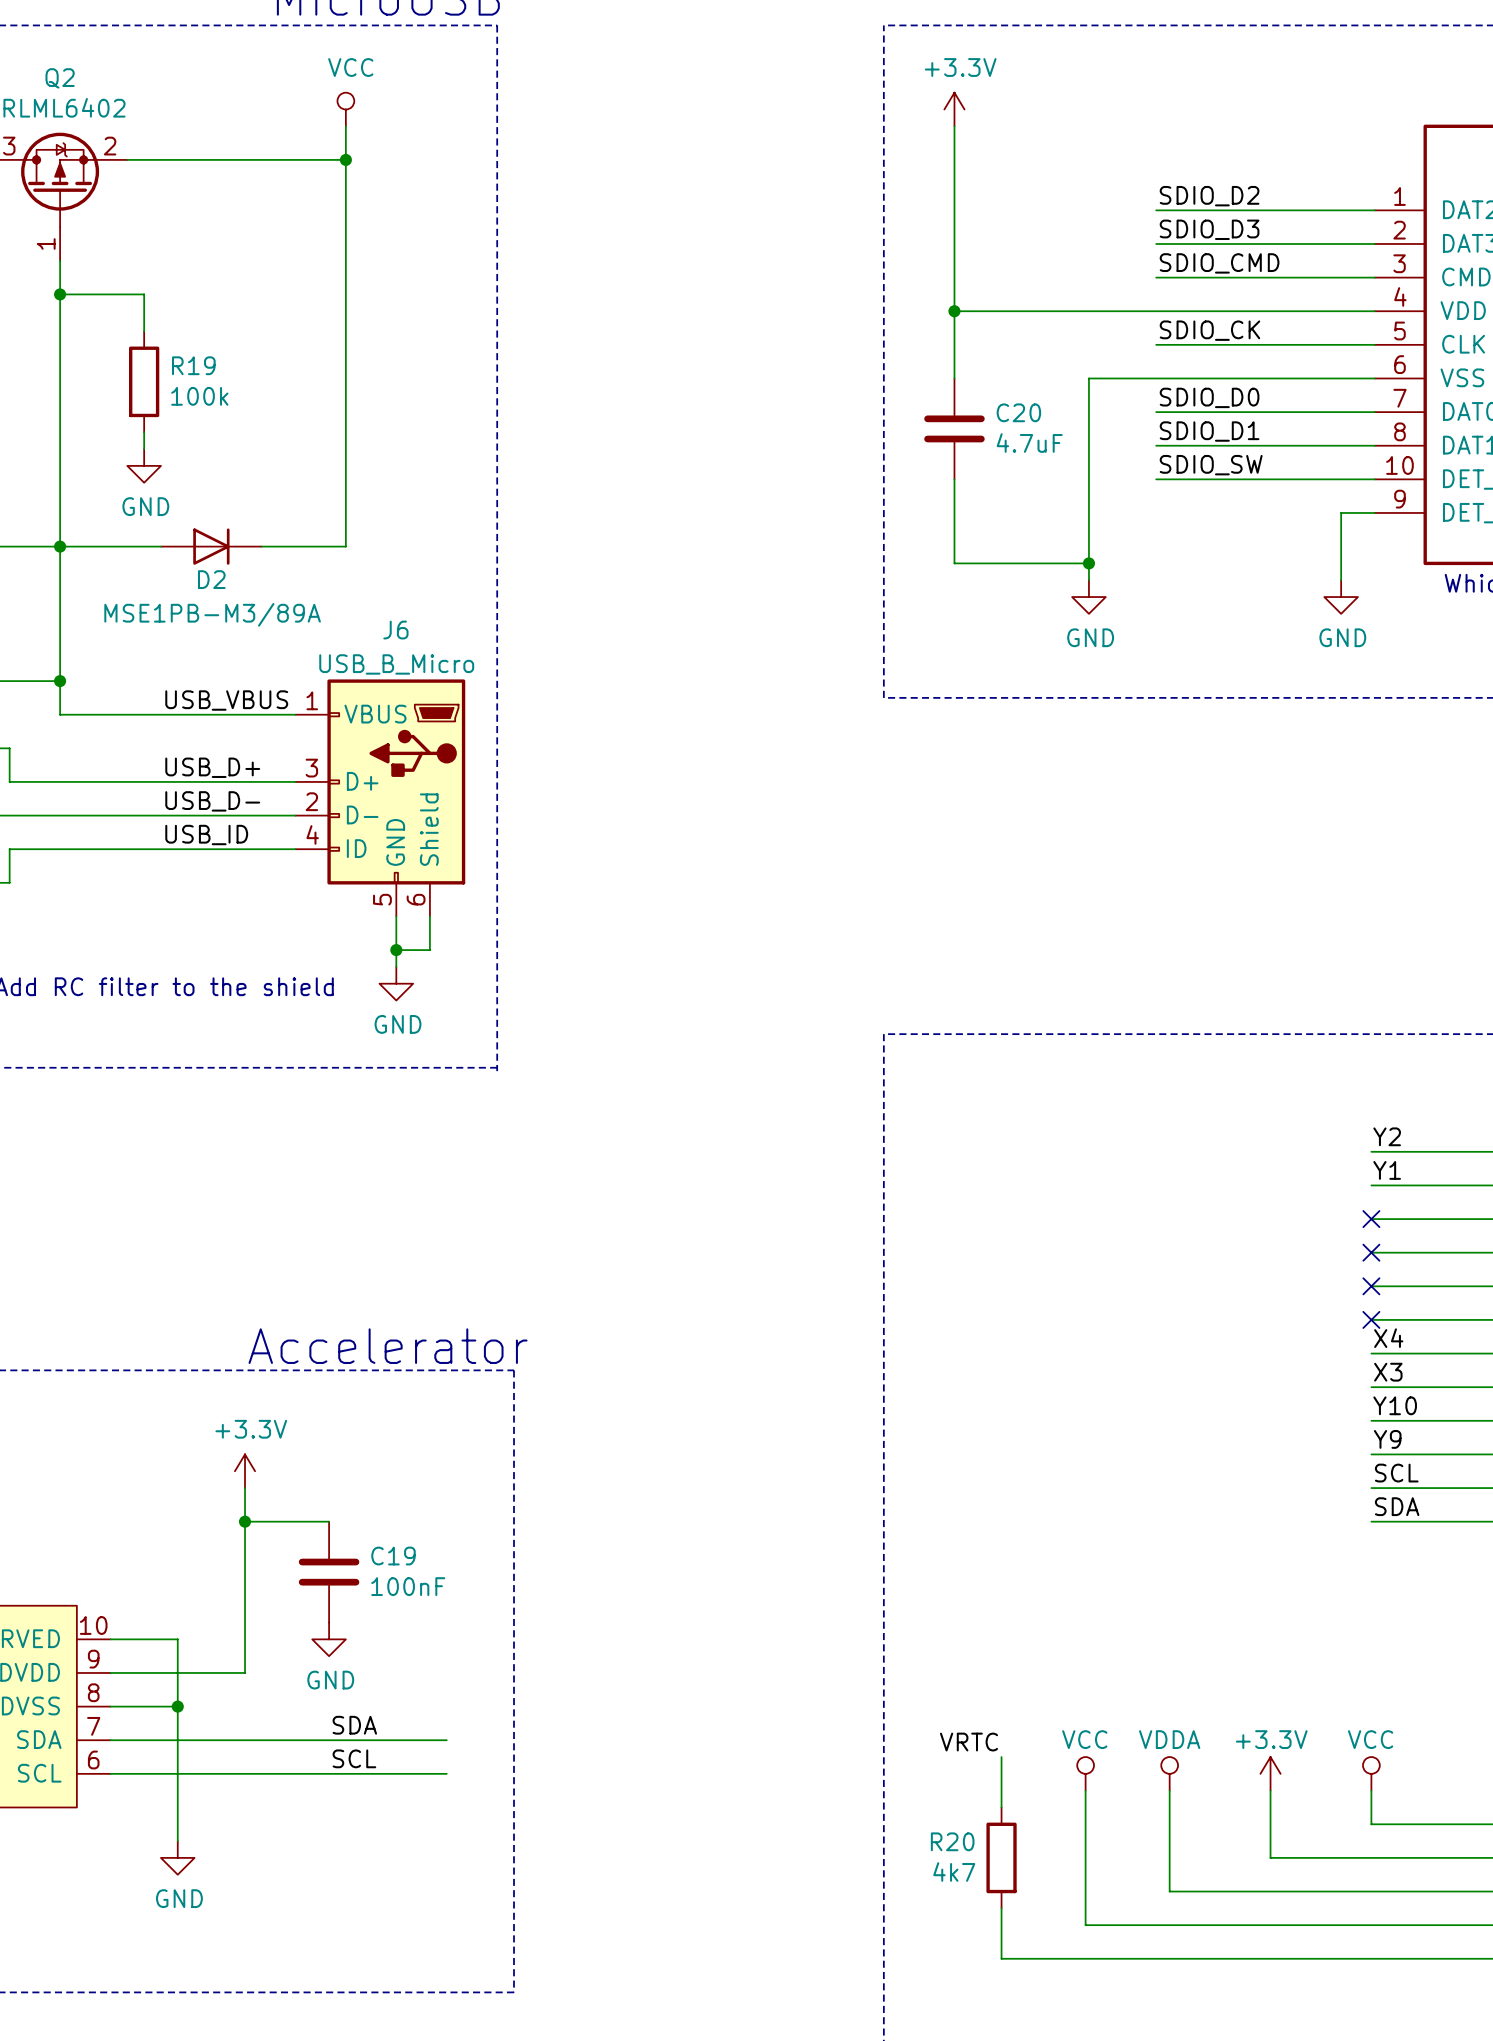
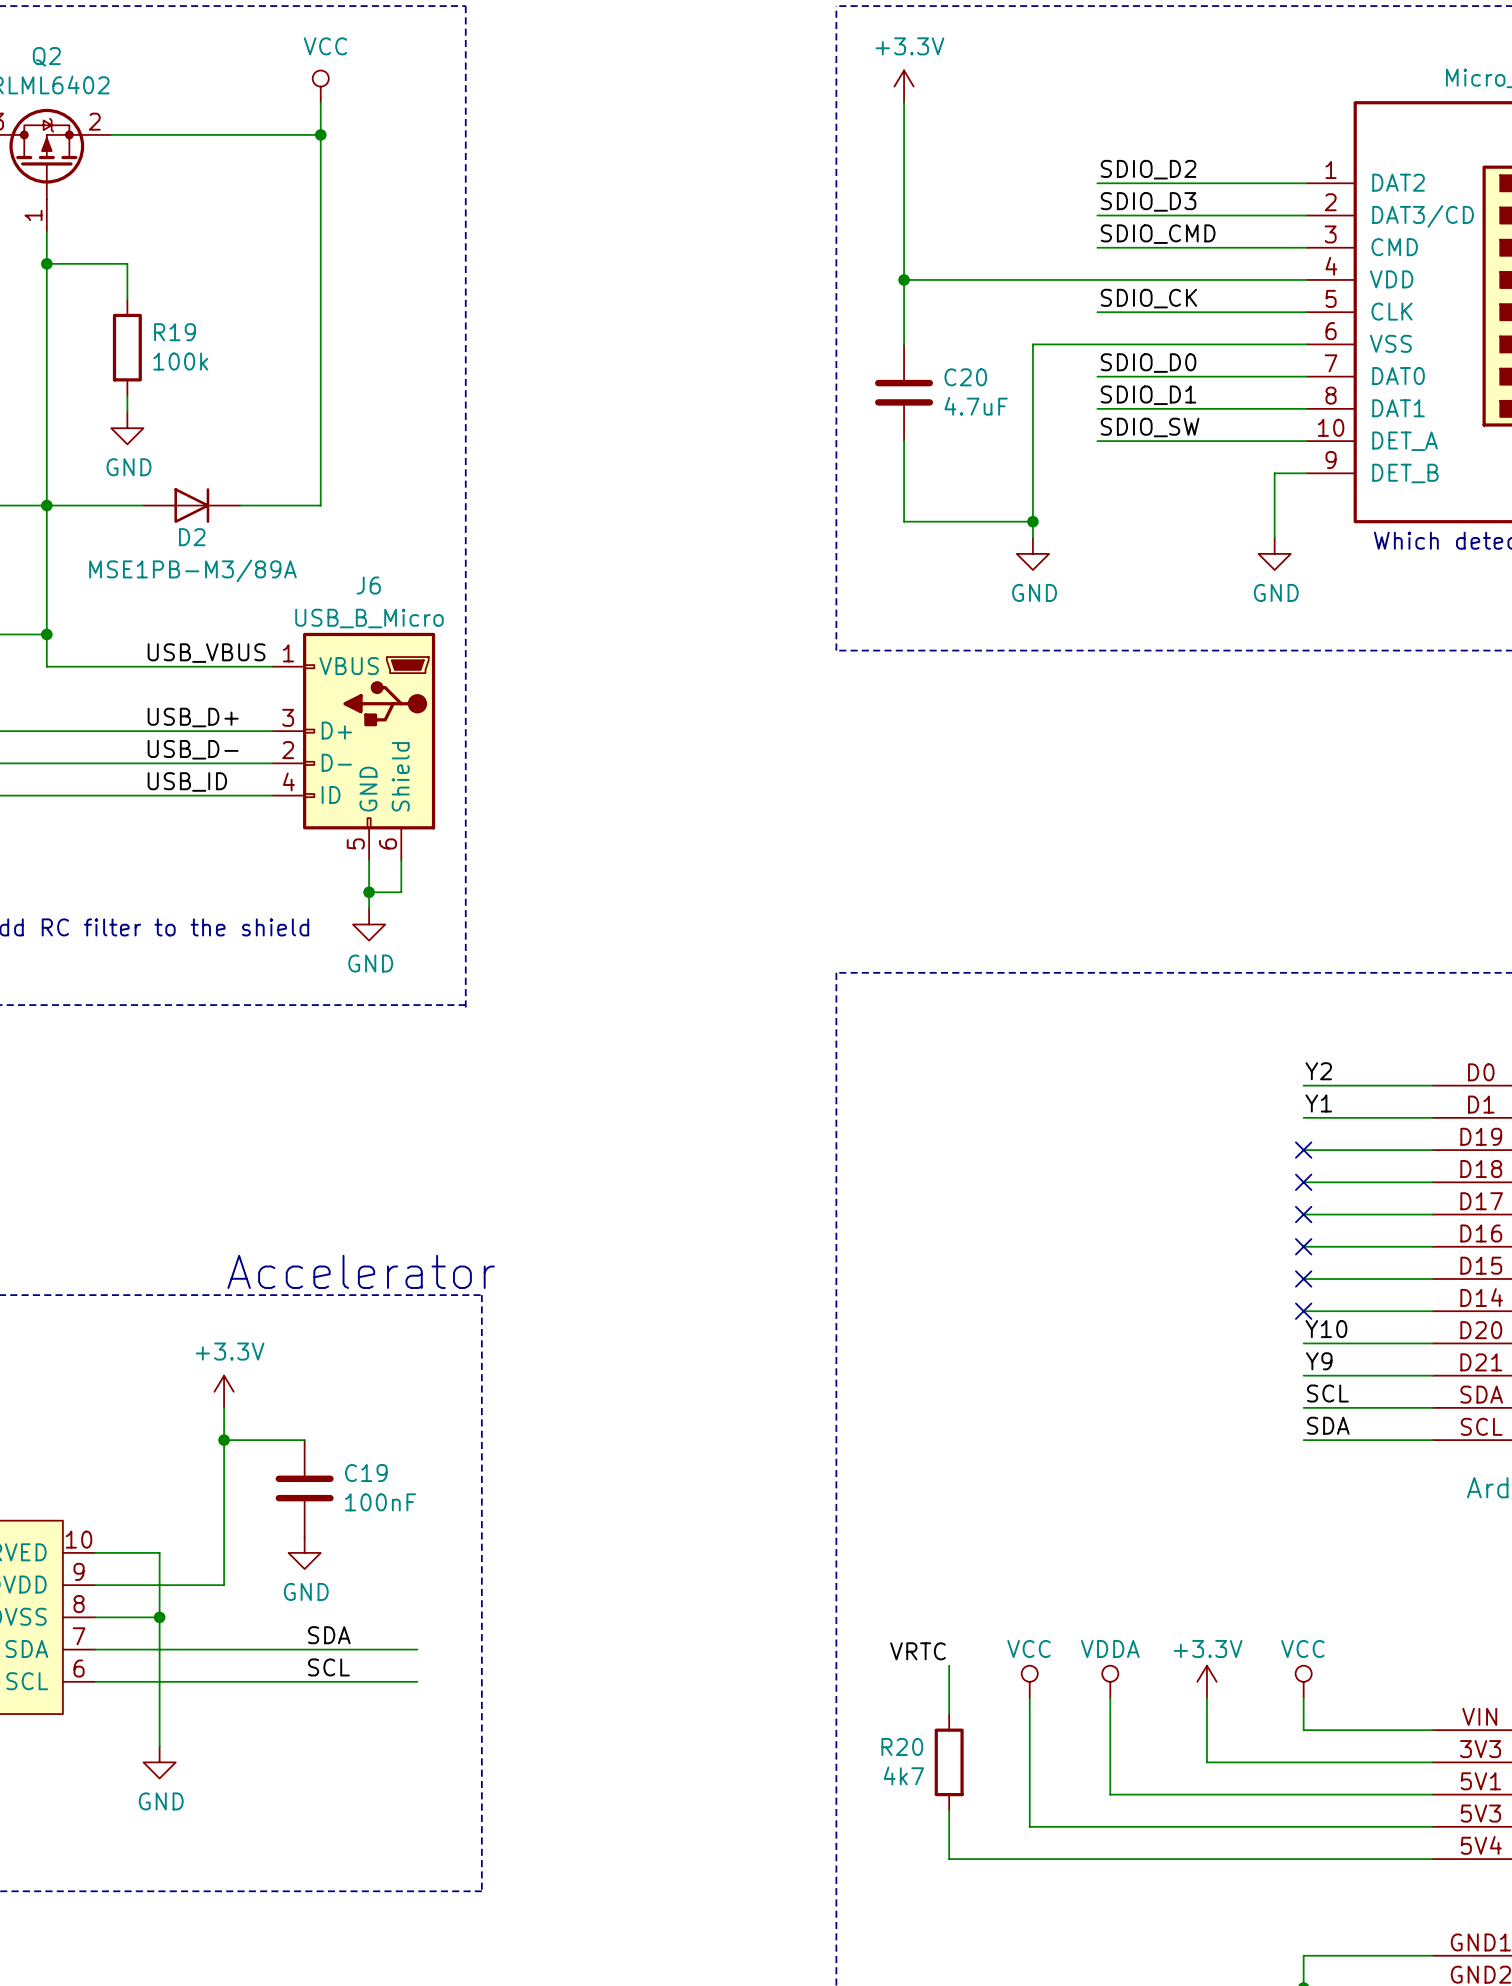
label: X4 (1388, 1338) -> none
no-connect mark: none -> (1303, 1278)
label: X3 (1388, 1372) -> none
no-connect mark: none -> (1303, 1311)

